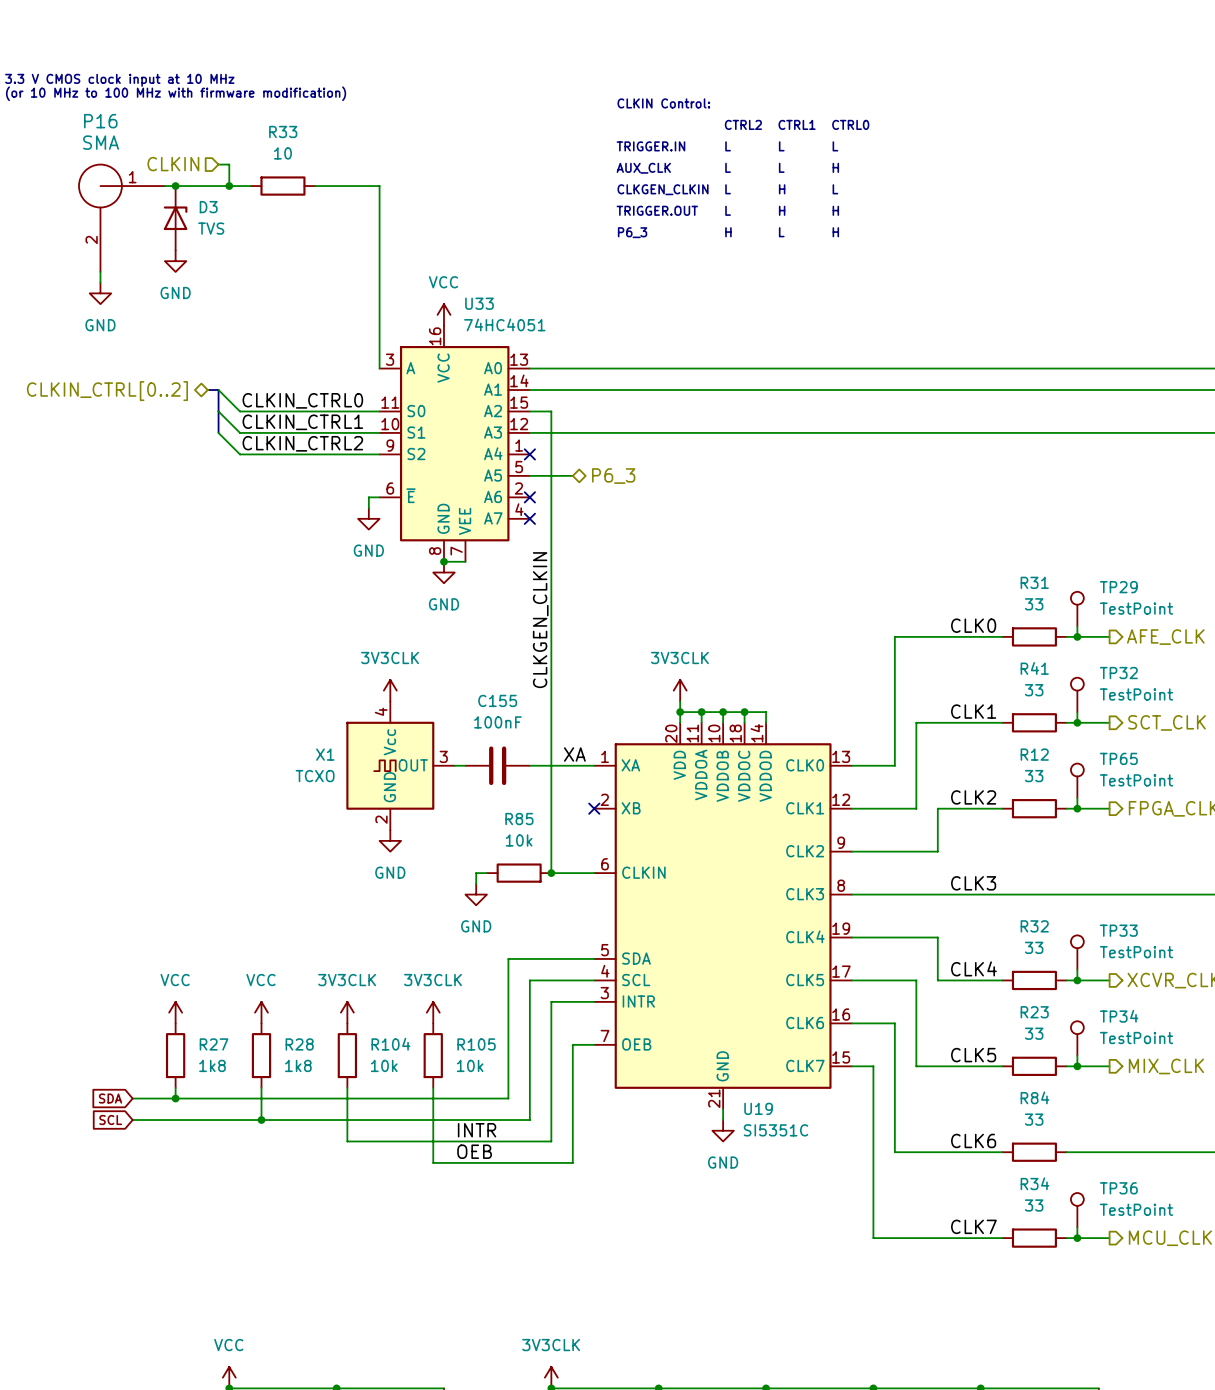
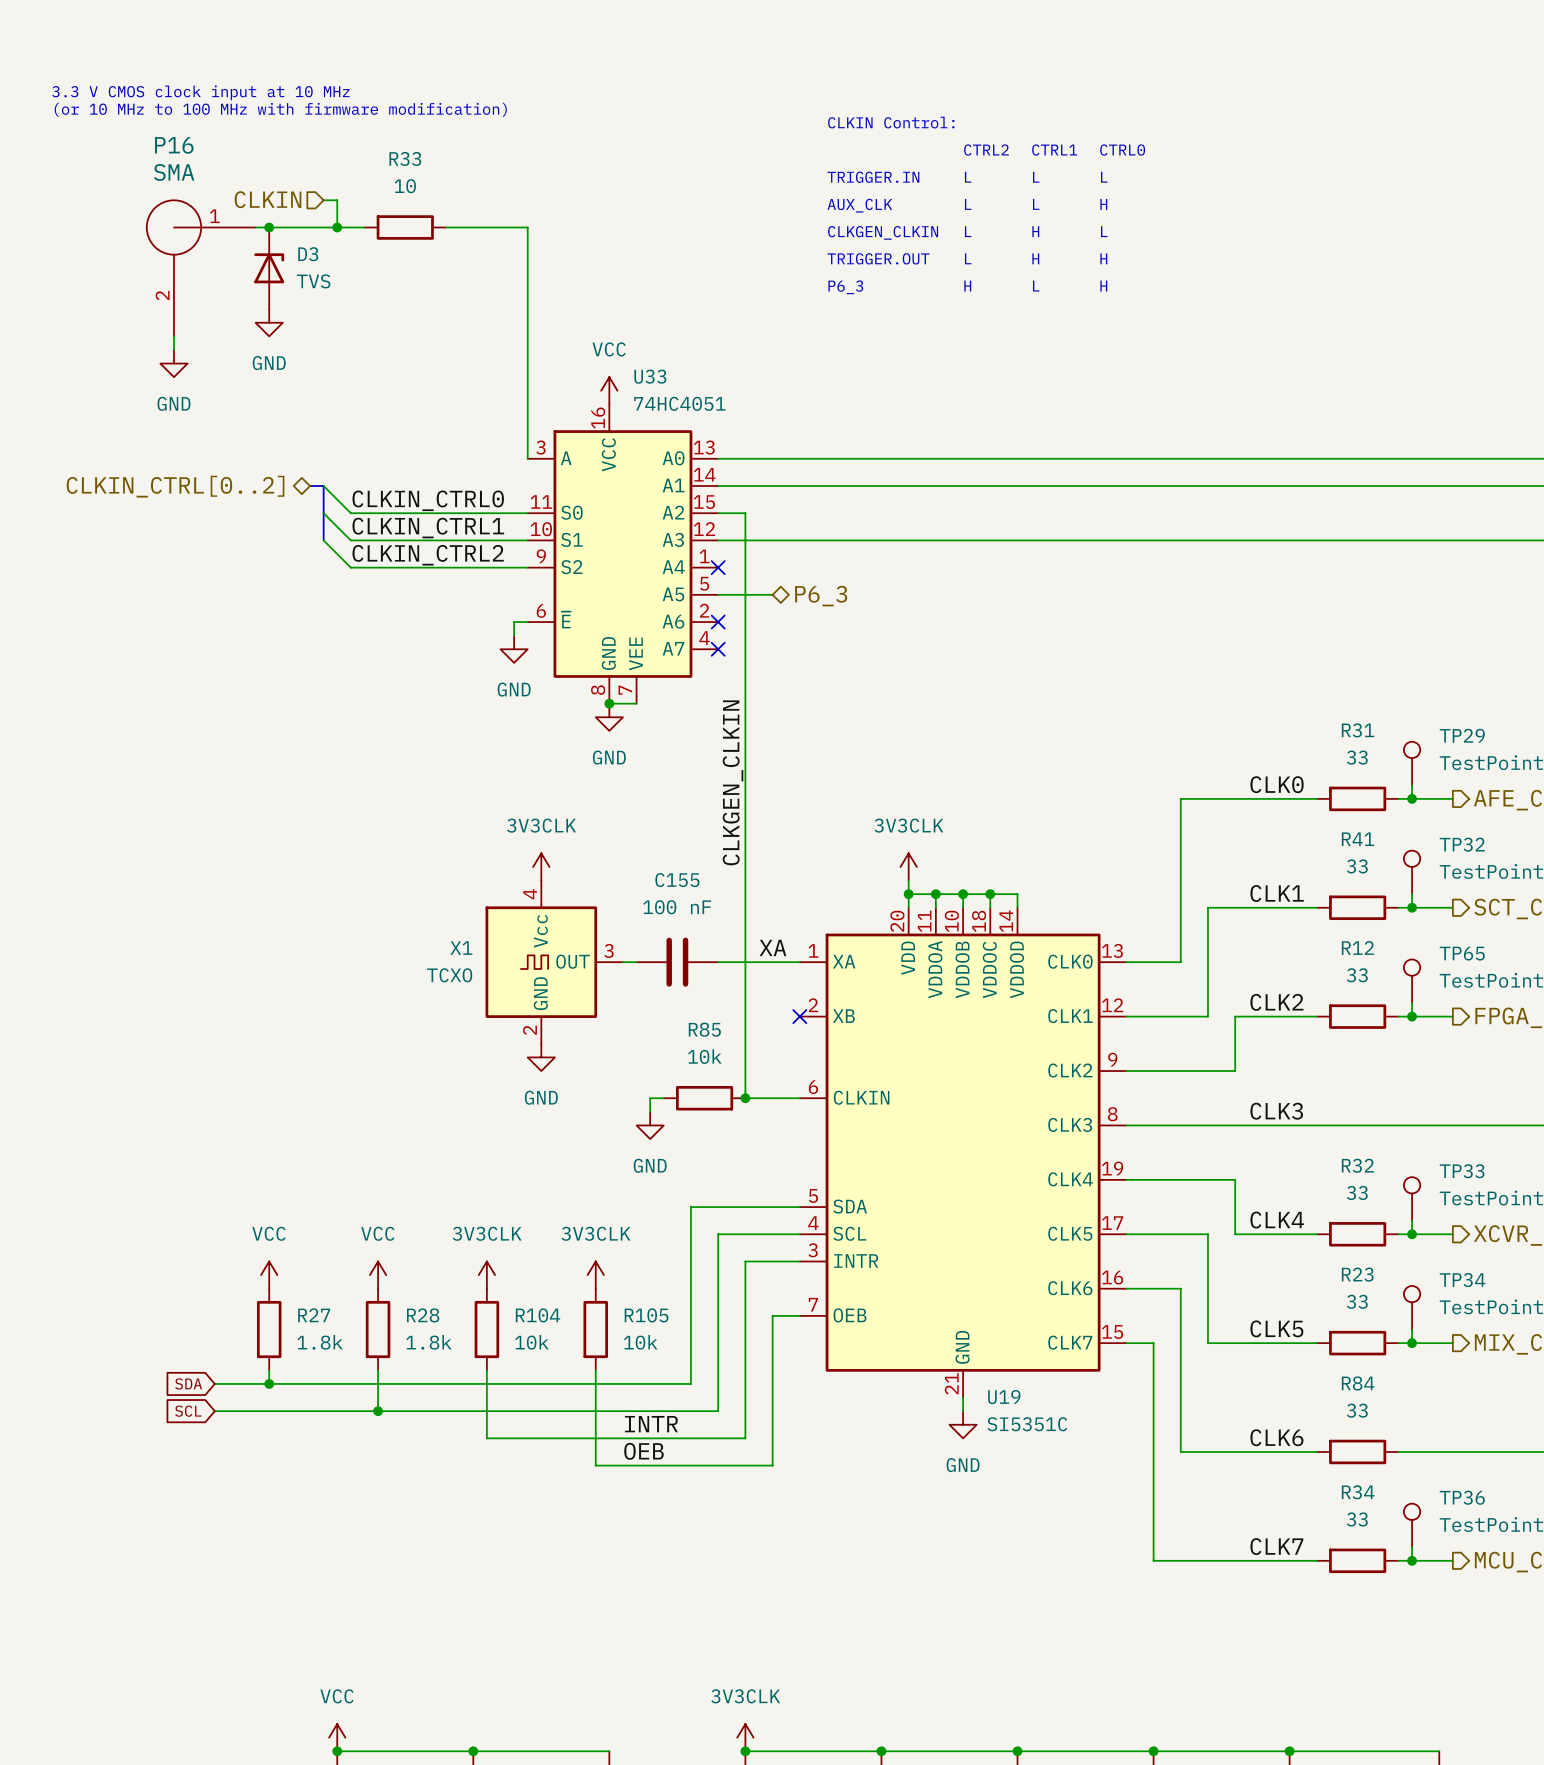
C155 value: 100nF (497, 722) -> 100 nF (677, 907)
R27 value: 1k8 (212, 1065) -> 1.8k (320, 1342)
R28 value: 1k8 (298, 1065) -> 1.8k (428, 1342)

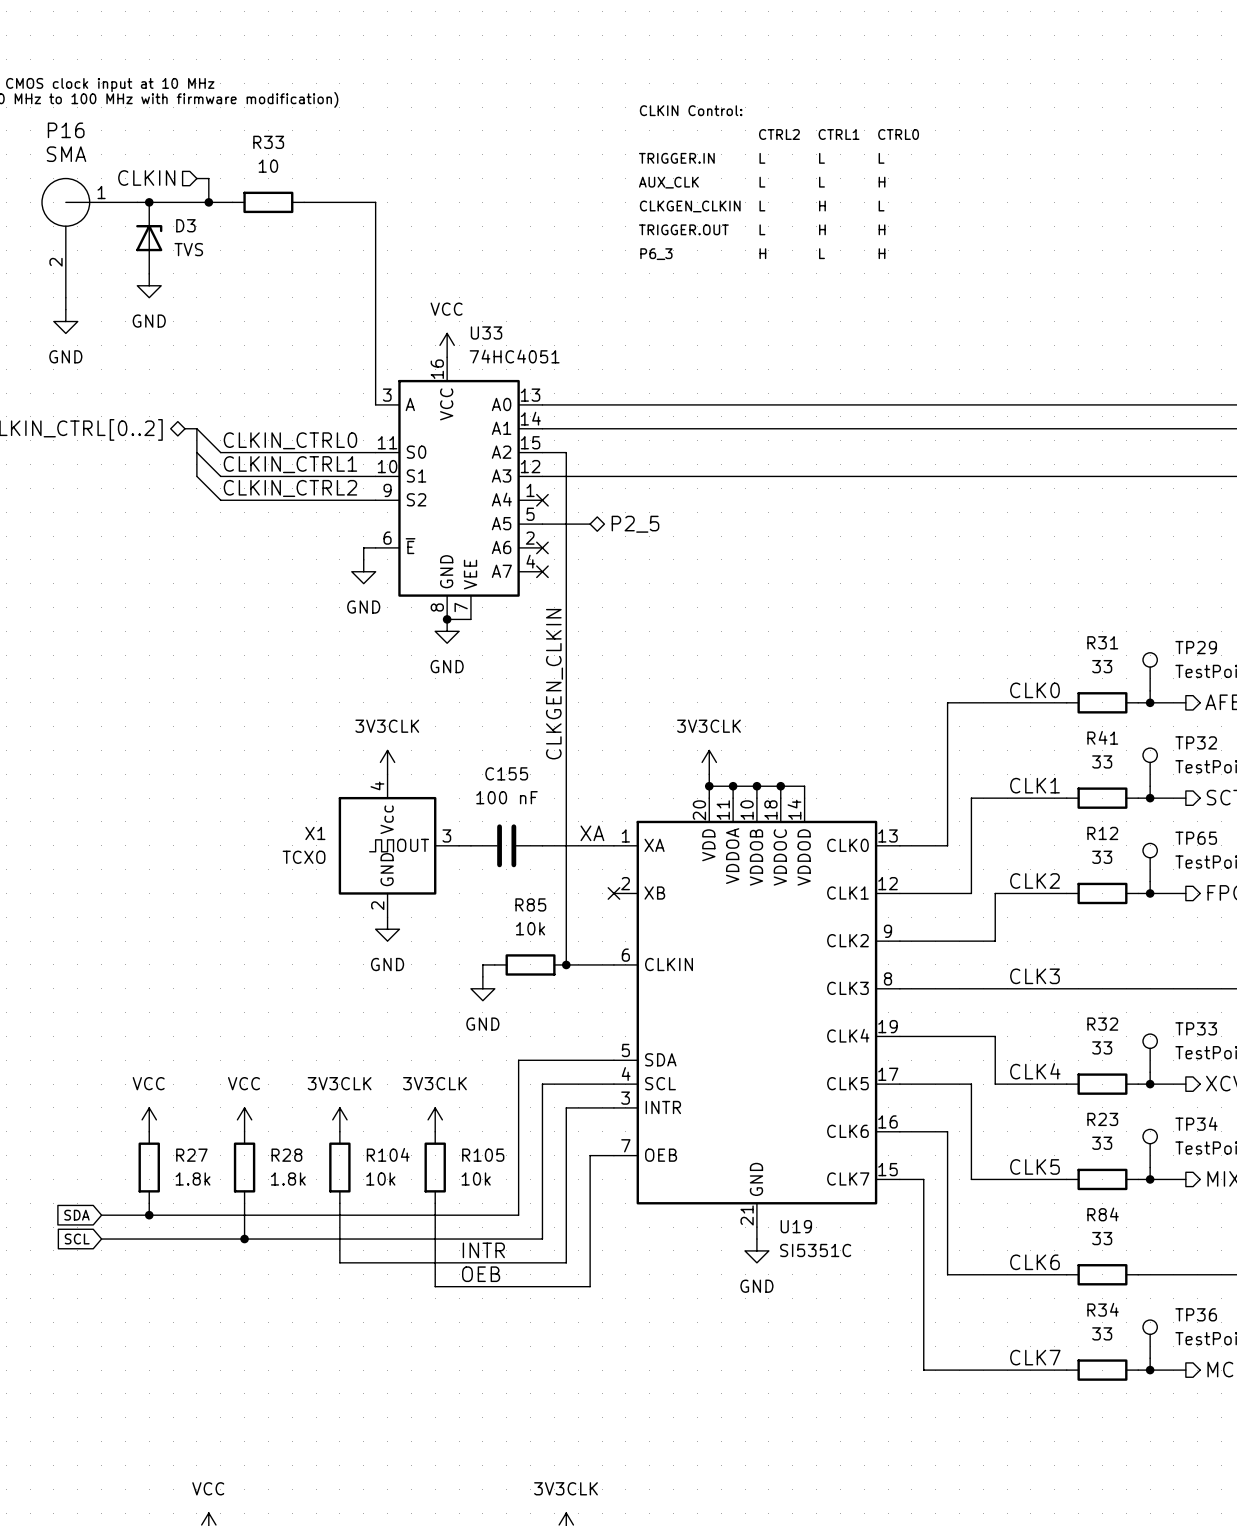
hierarchical label: P6_3 (821, 596) -> P2_5 (635, 524)

